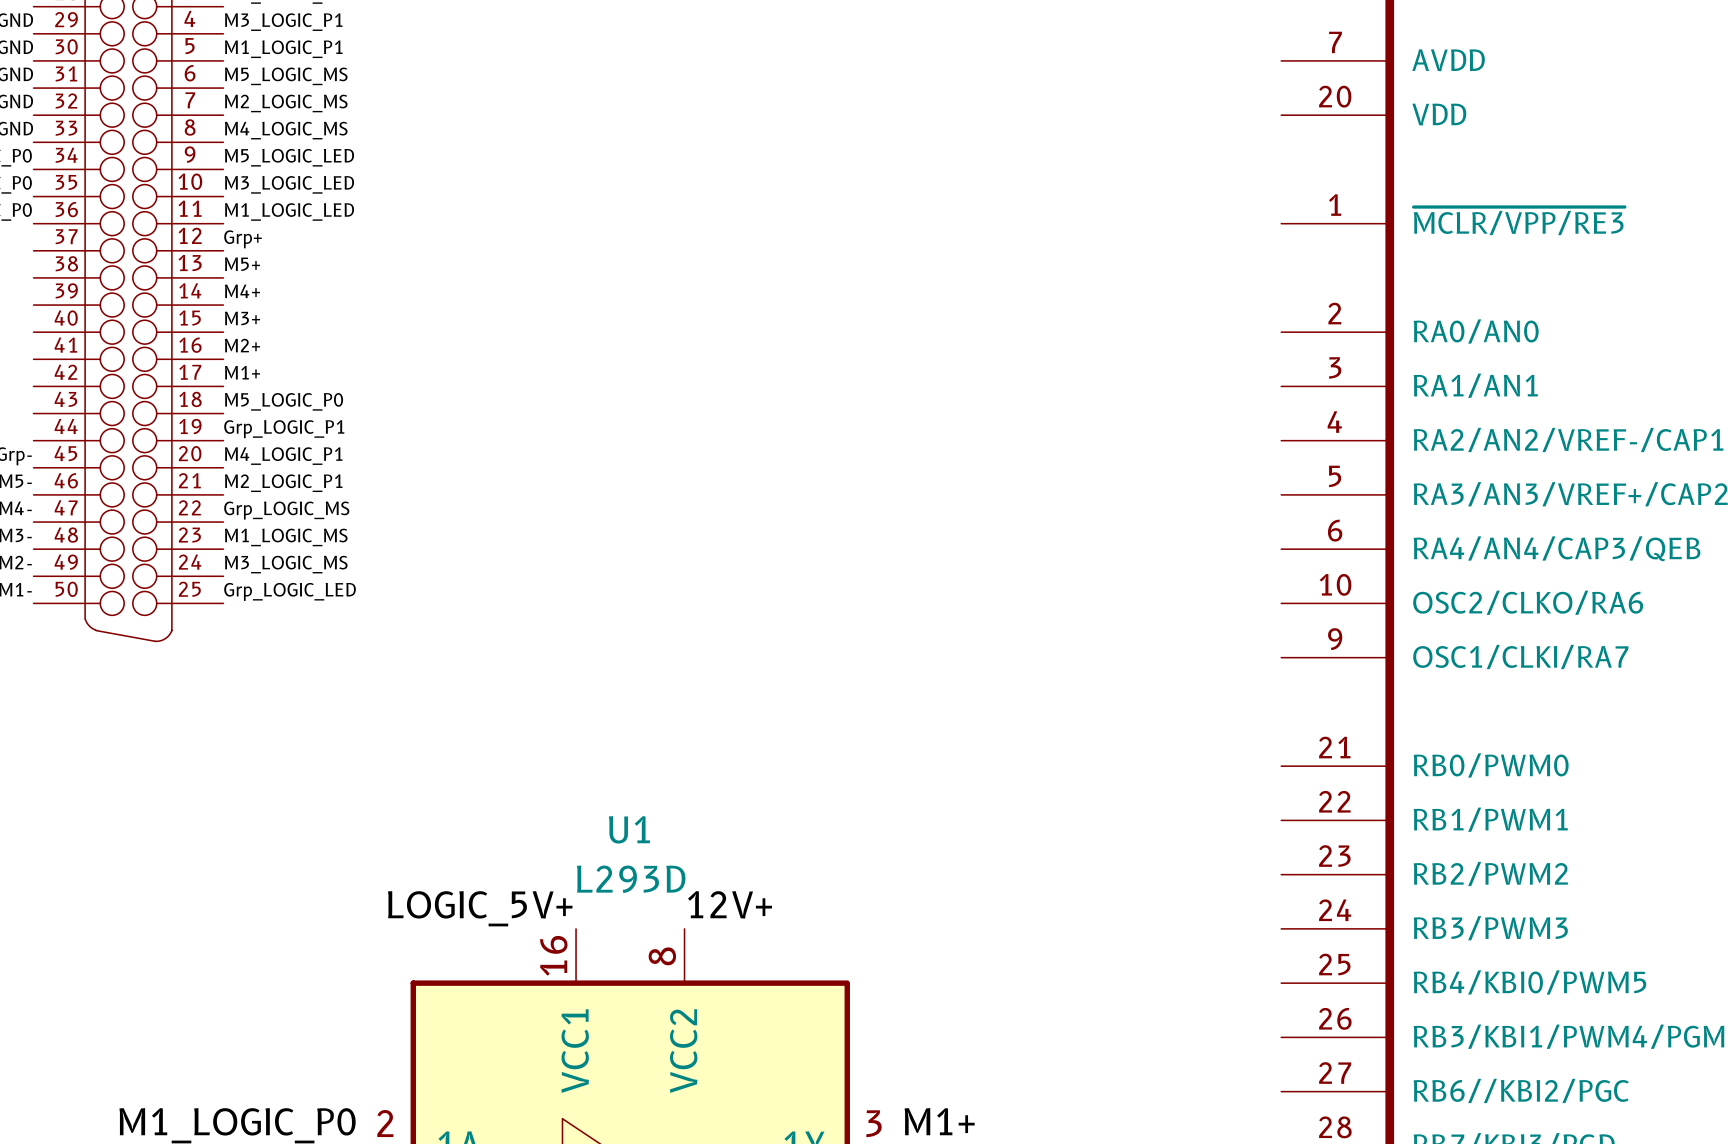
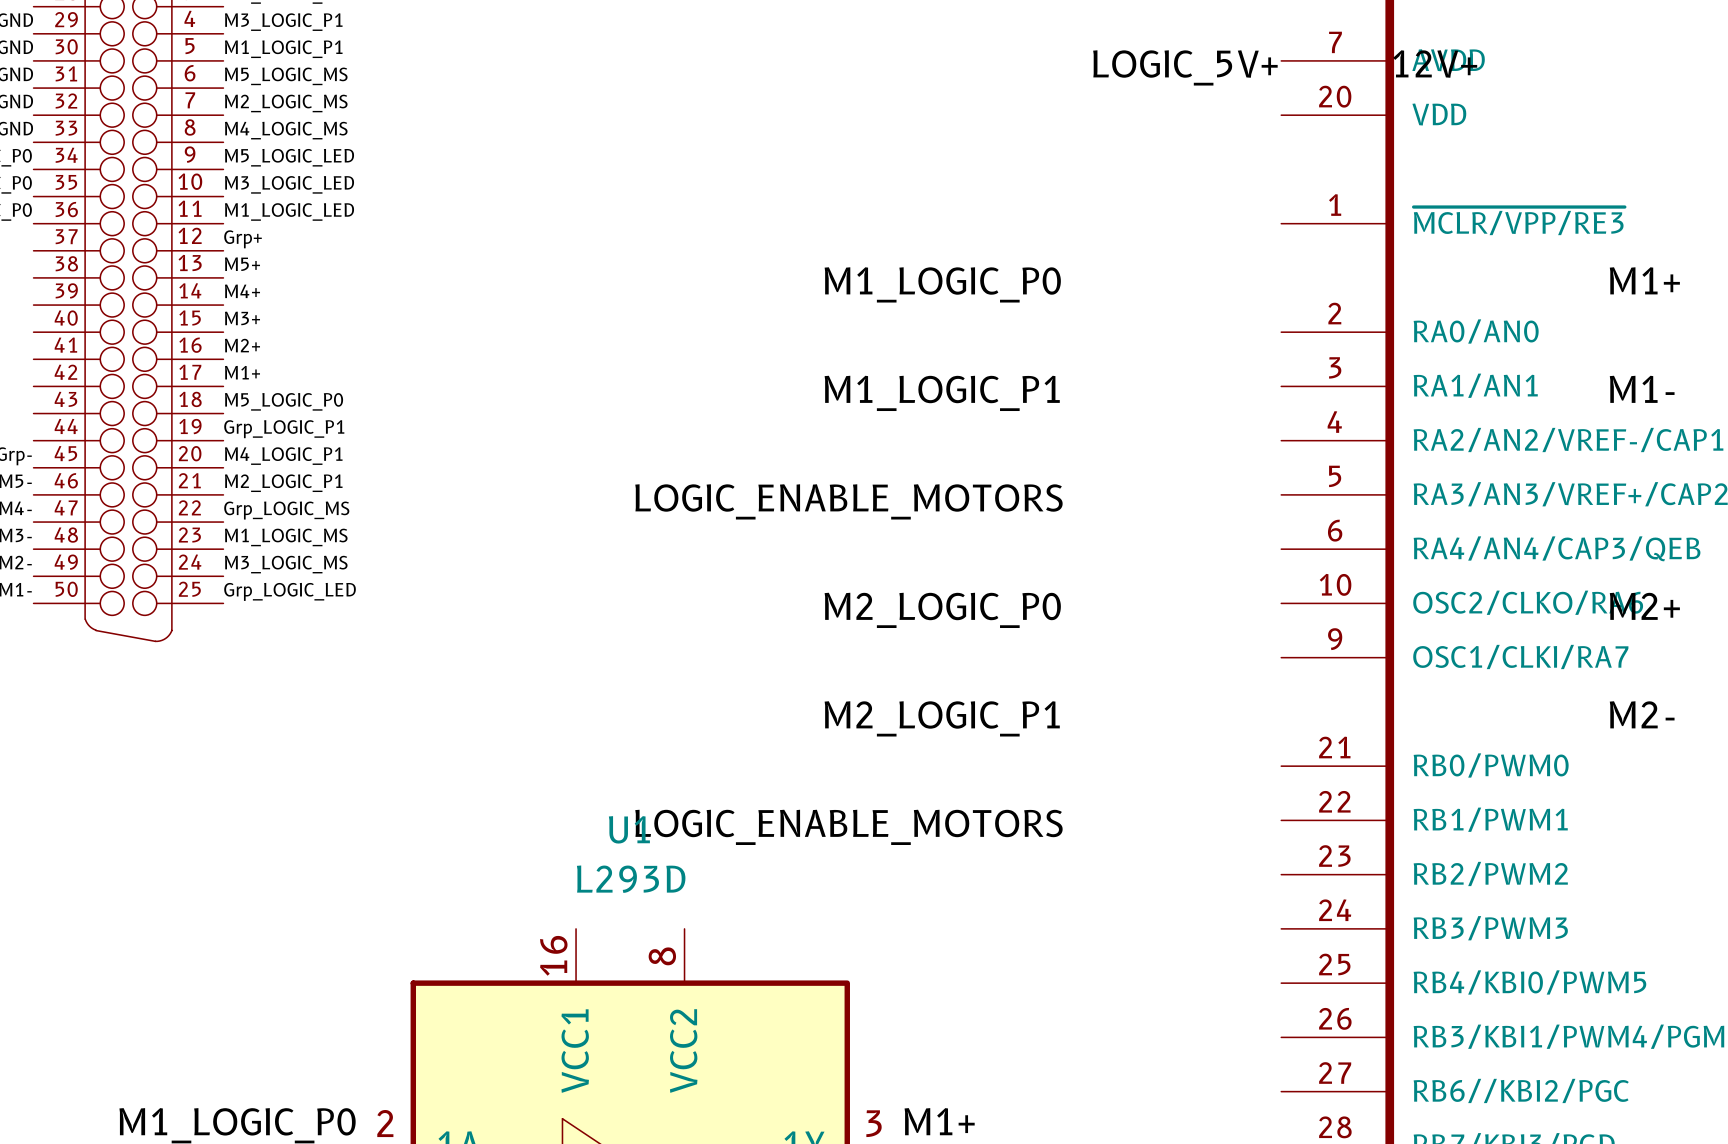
label: none -> 12V+ (1435, 64)
label: none -> LOGIC_5V+ (1185, 67)
label: none -> M1+ (1644, 280)
label: none -> M1_LOGIC_P0 (942, 284)
label: none -> M1- (1642, 389)
label: none -> M1_LOGIC_P1 (942, 393)
label: none -> LOGIC_ENABLE_MOTORS (848, 501)
label: none -> M2+ (1644, 606)
label: none -> M2_LOGIC_P0 (942, 610)
label: none -> M2- (1642, 714)
label: none -> M2_LOGIC_P1 (942, 718)
label: none -> LOGIC_ENABLE_MOTORS (848, 827)
label: 12V+ (730, 904) -> none
label: LOGIC_5V+ (480, 908) -> none

